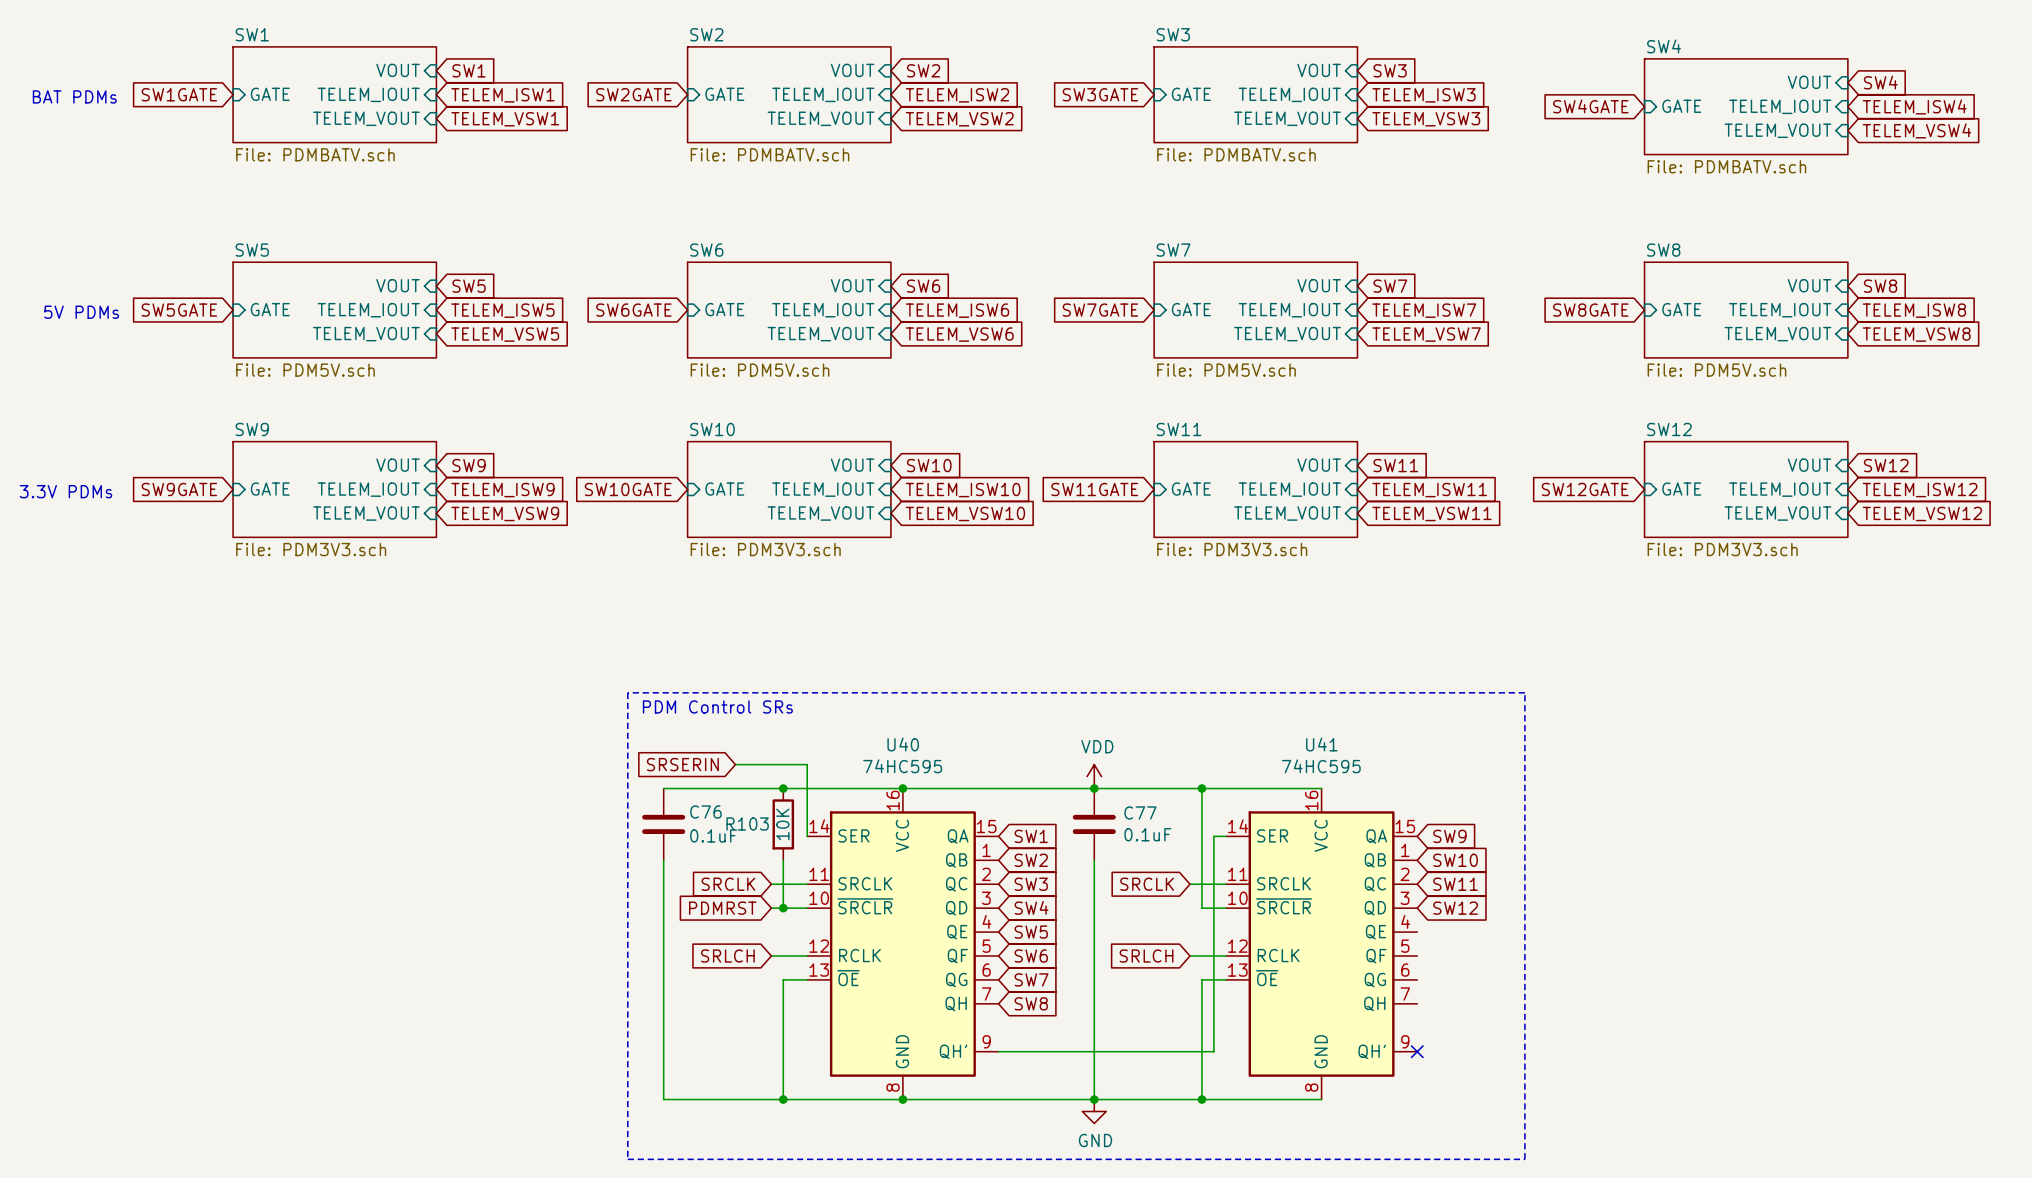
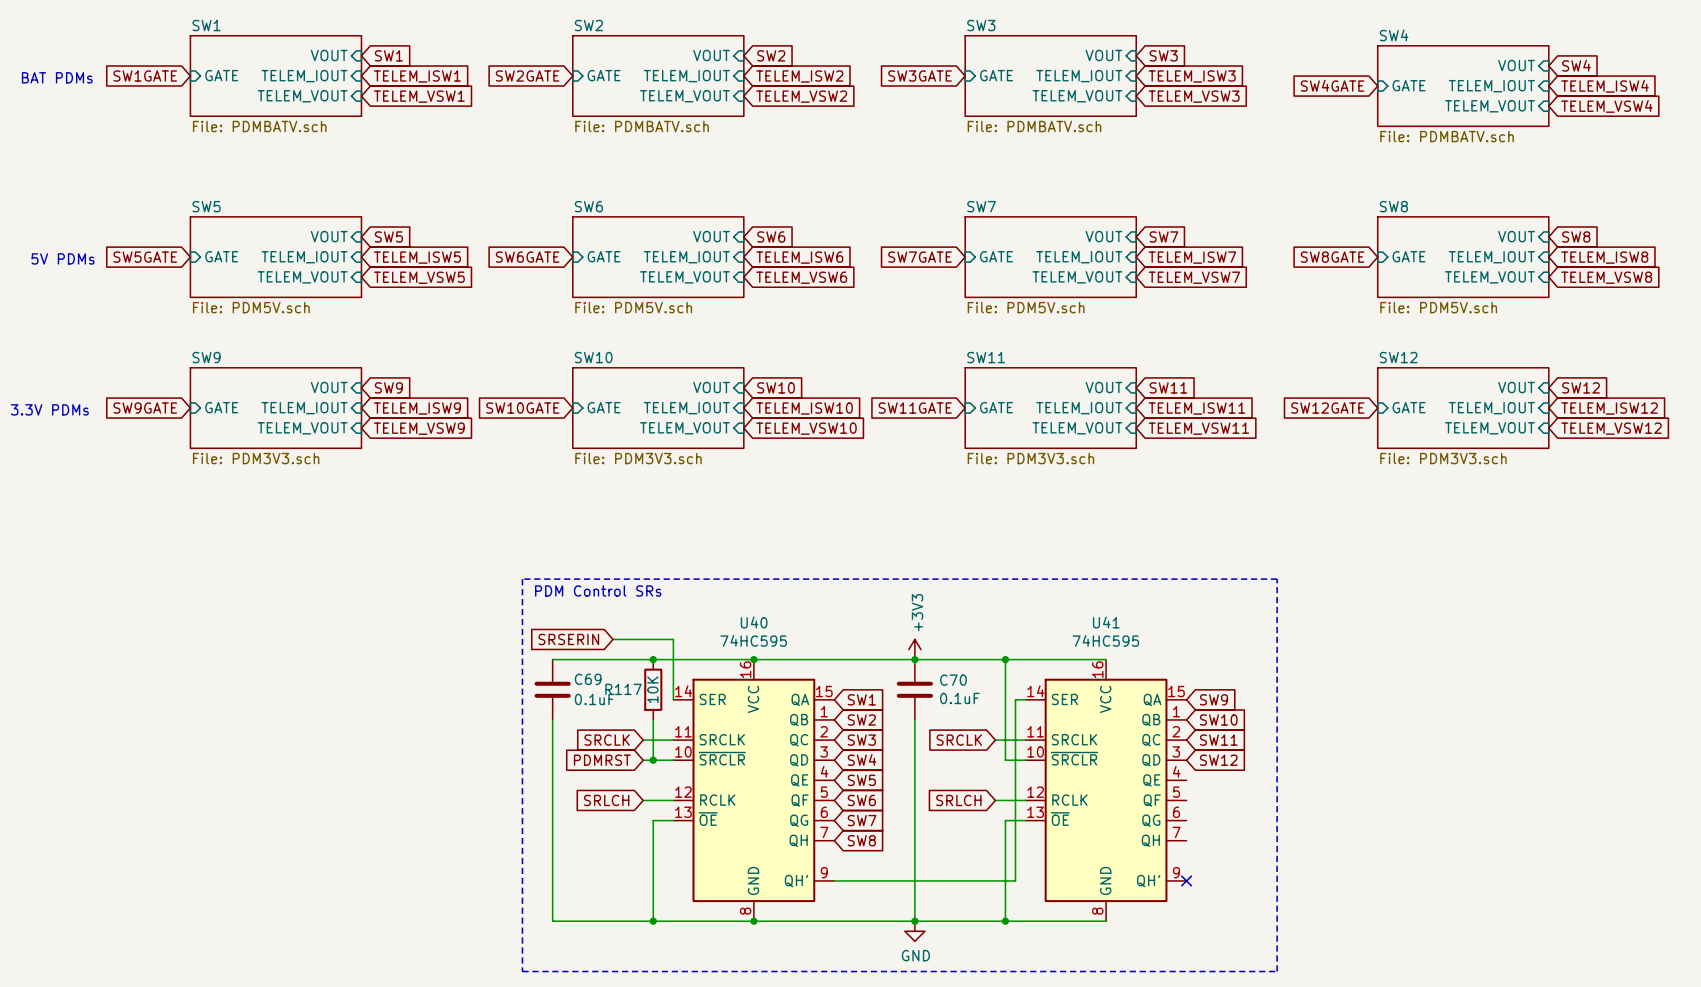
power symbol: VDD (1094, 776) -> +3V3 (914, 649)
C76 name: C76 (705, 812) -> C69 (588, 679)
C77 name: C77 (1140, 812) -> C70 (953, 680)
R103 name: R103 (747, 823) -> R117 (623, 689)

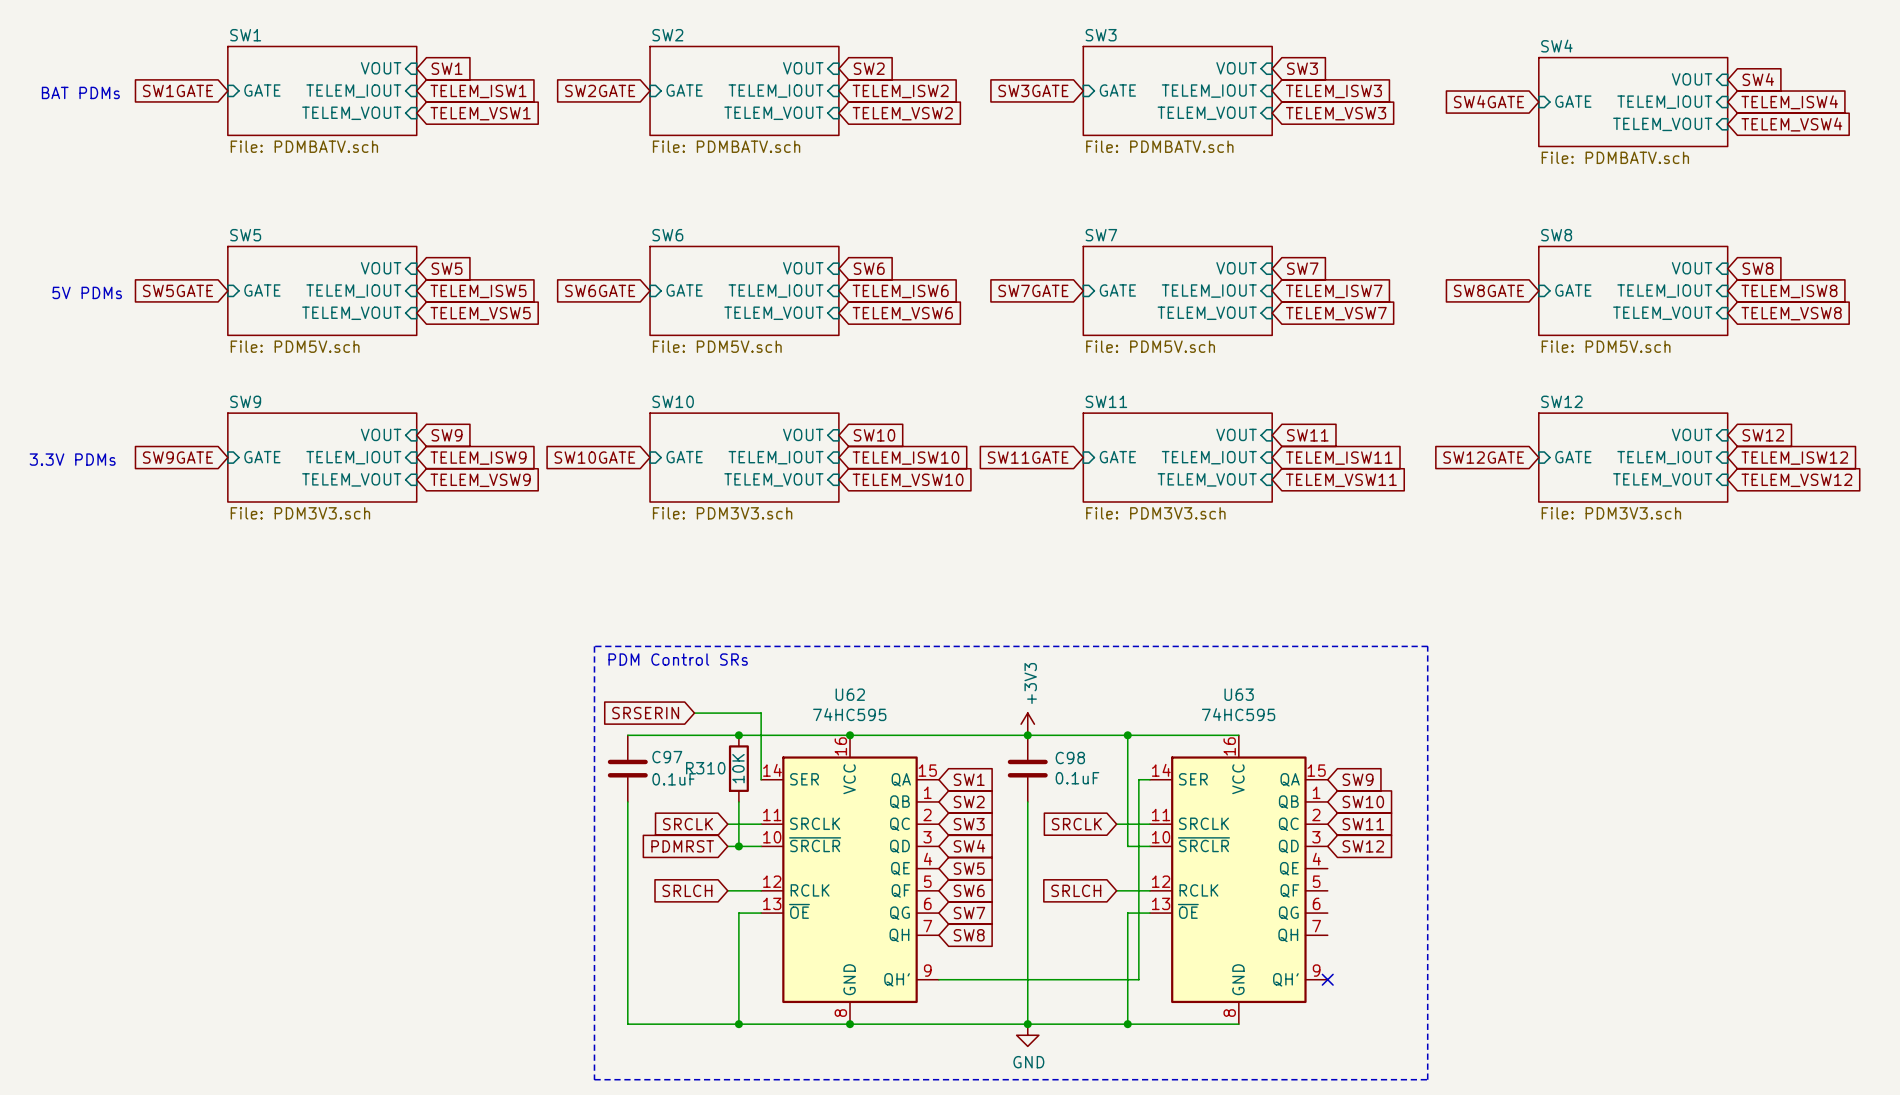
U40 name: U40 (754, 622) -> U62 (850, 694)
U41 name: U41 (1106, 622) -> U63 (1239, 694)
C69 name: C69 (588, 679) -> C97 (667, 757)
C70 name: C70 (953, 680) -> C98 (1070, 758)
R117 name: R117 (623, 689) -> R310 (705, 768)

